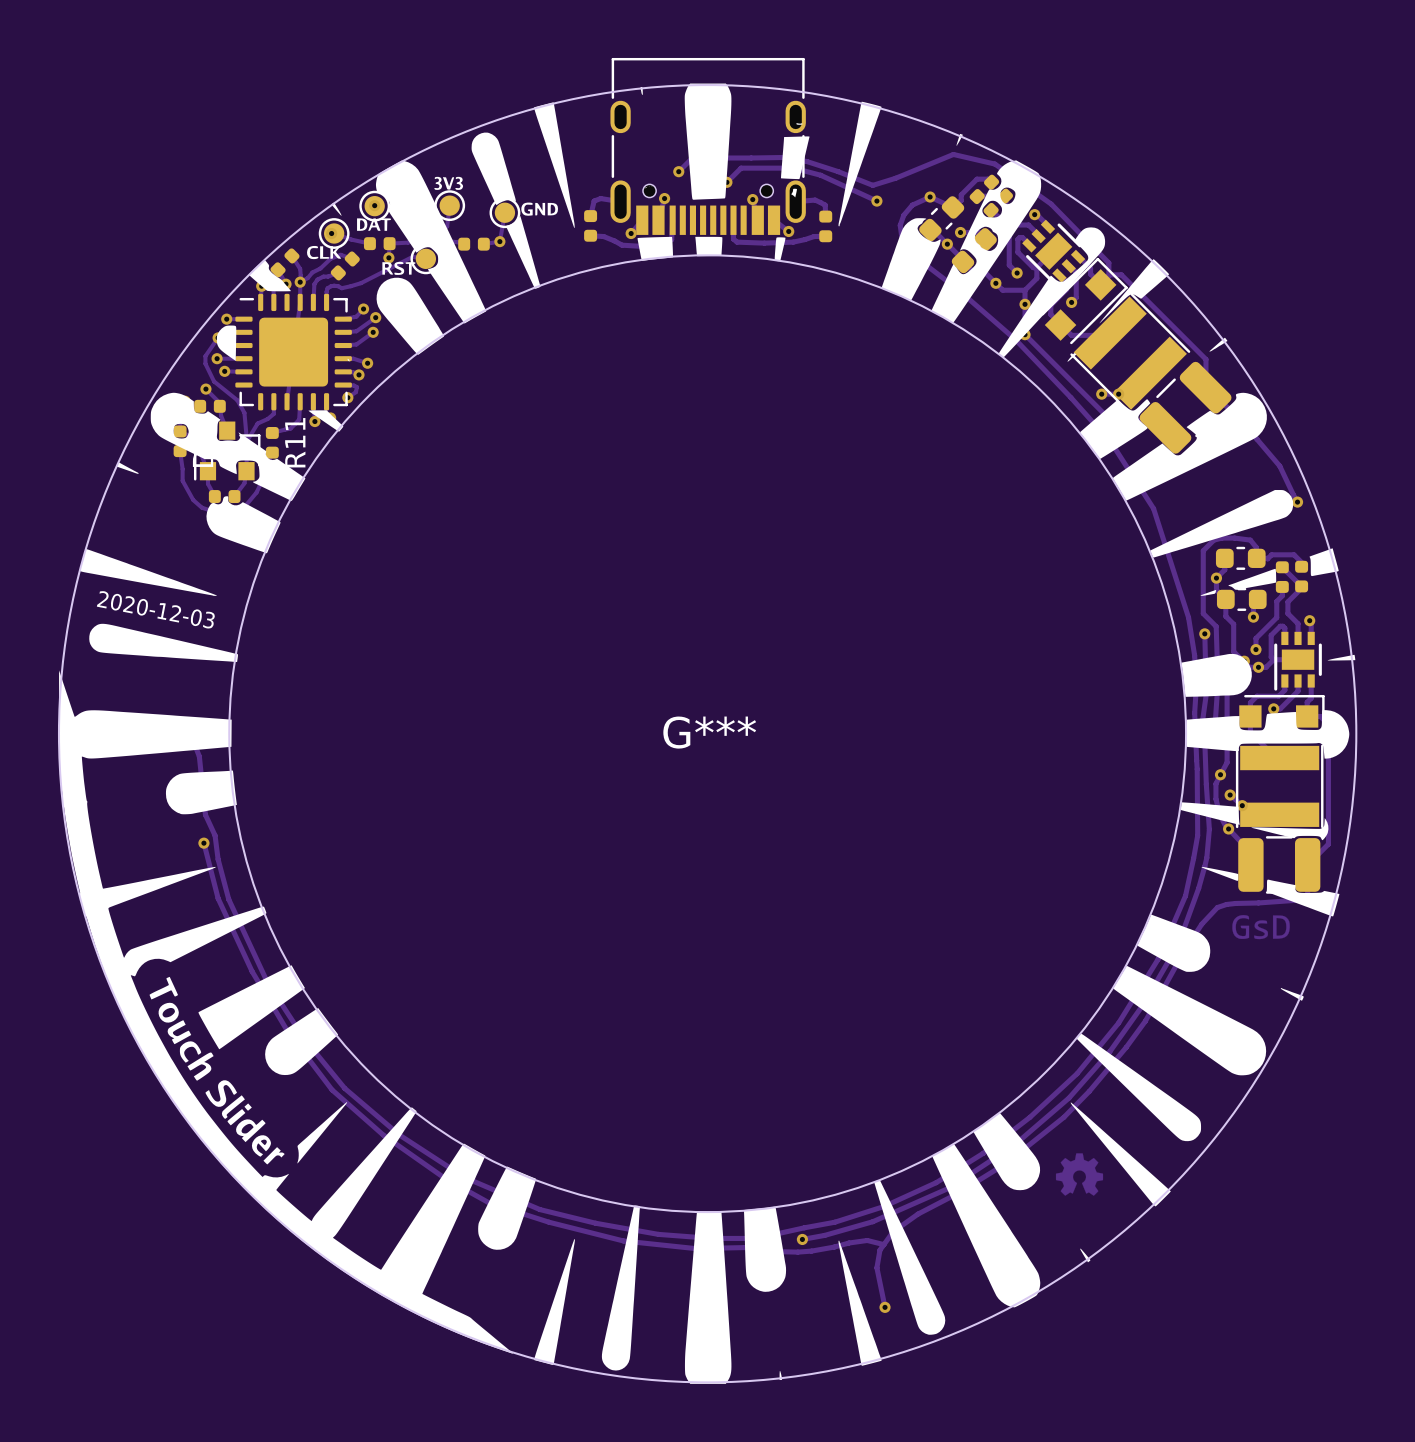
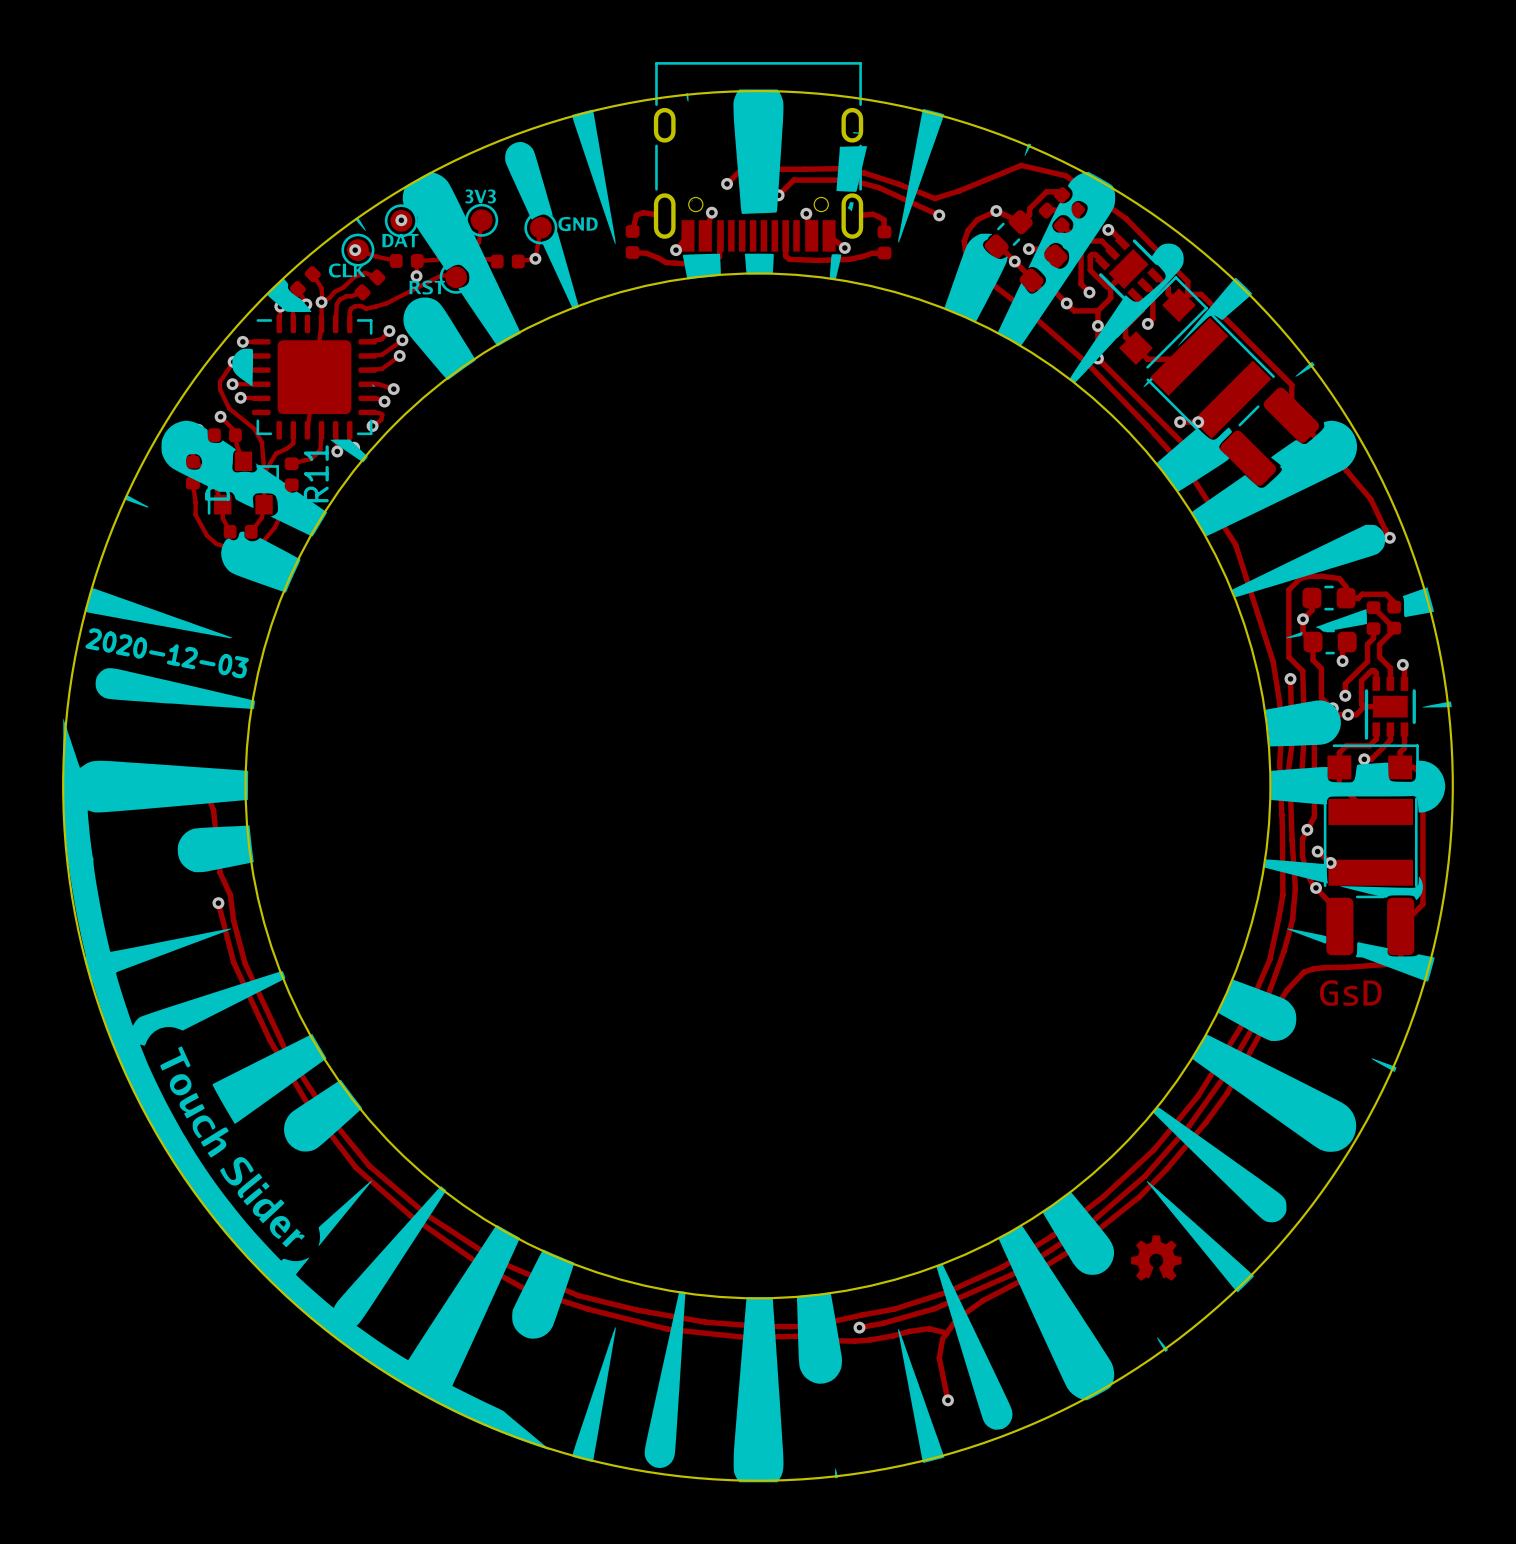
G***: (707, 733) -> none

